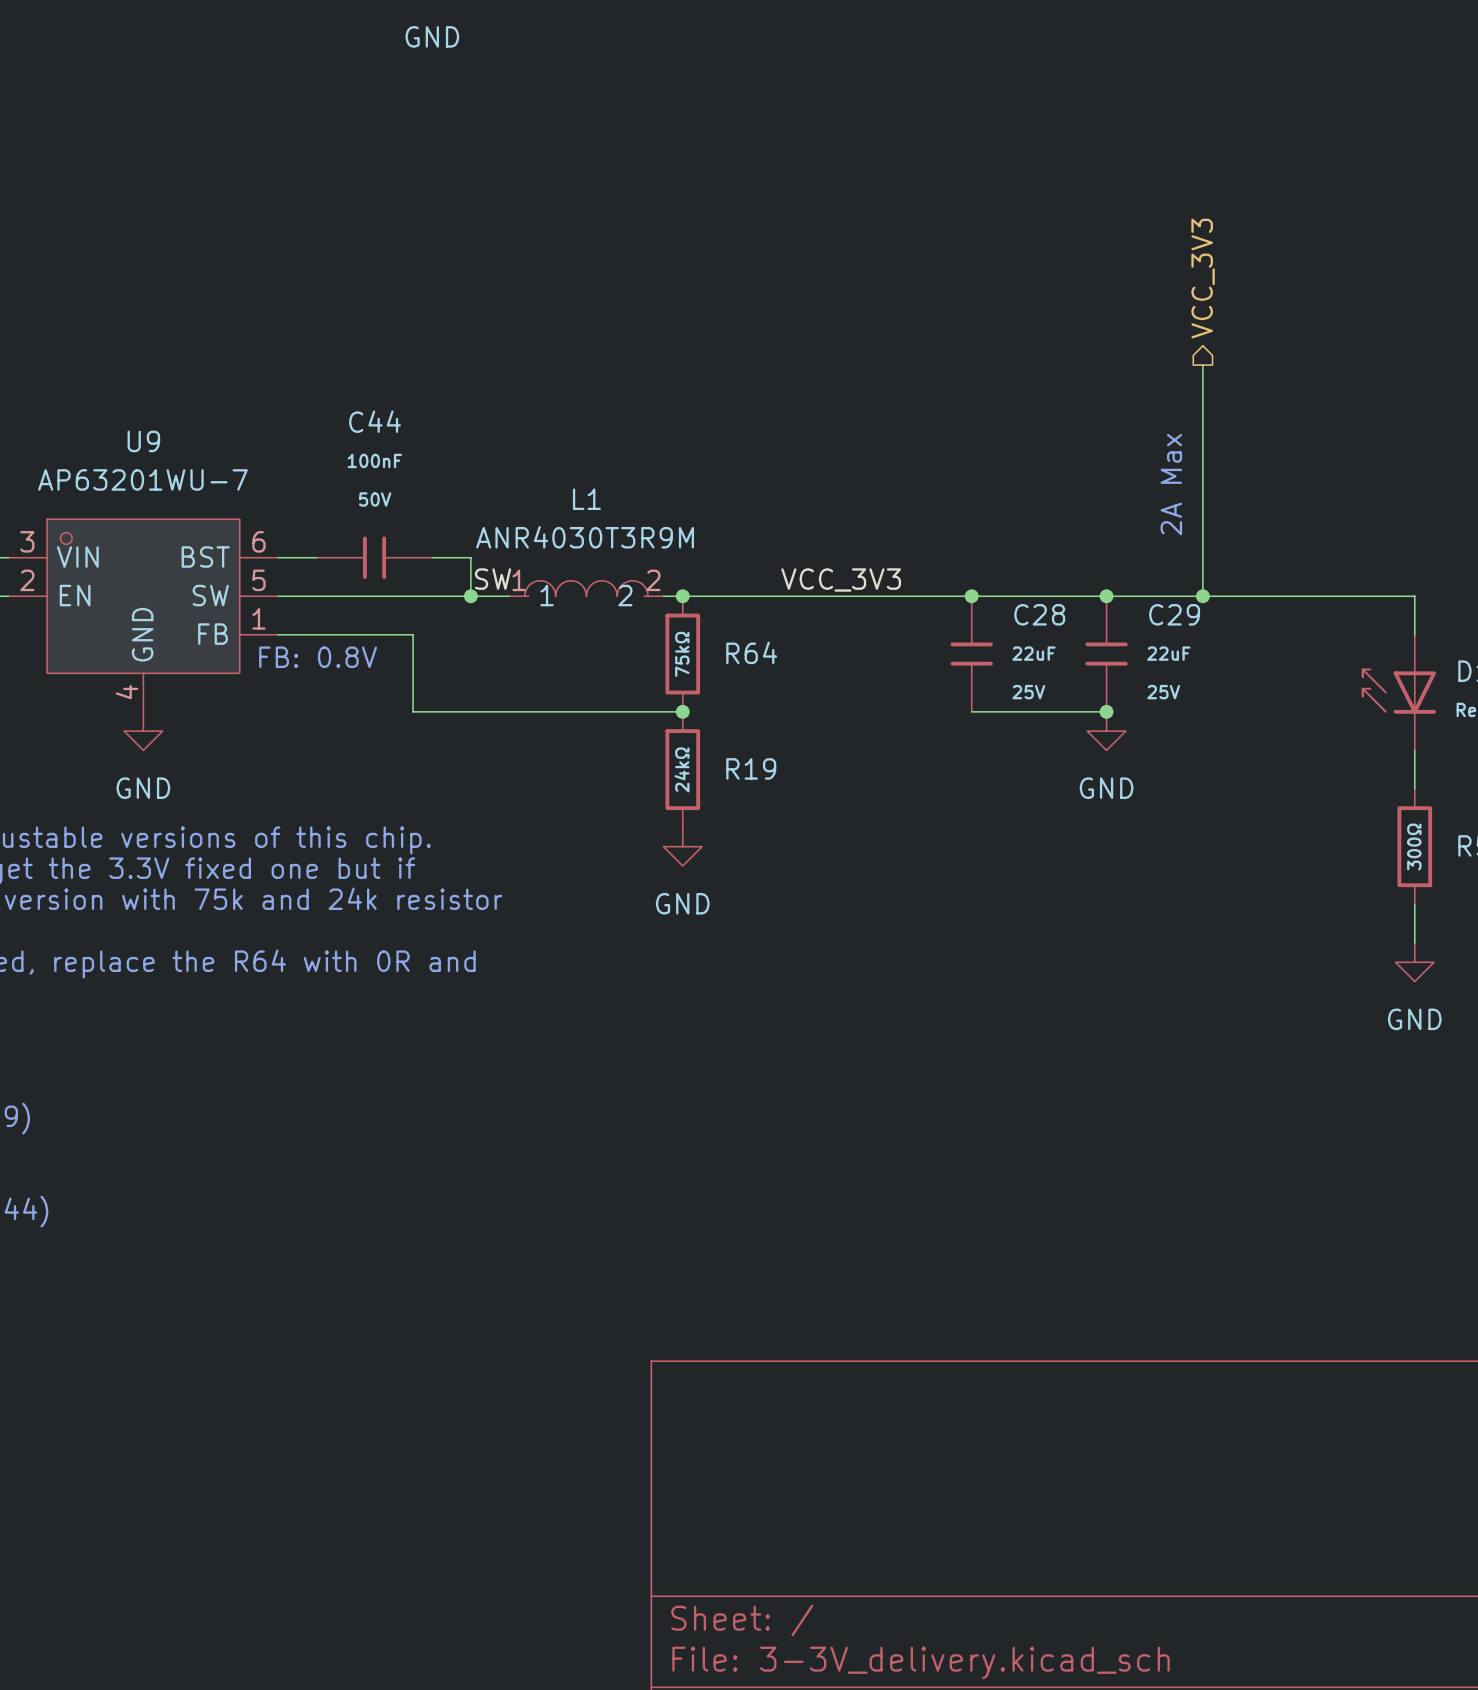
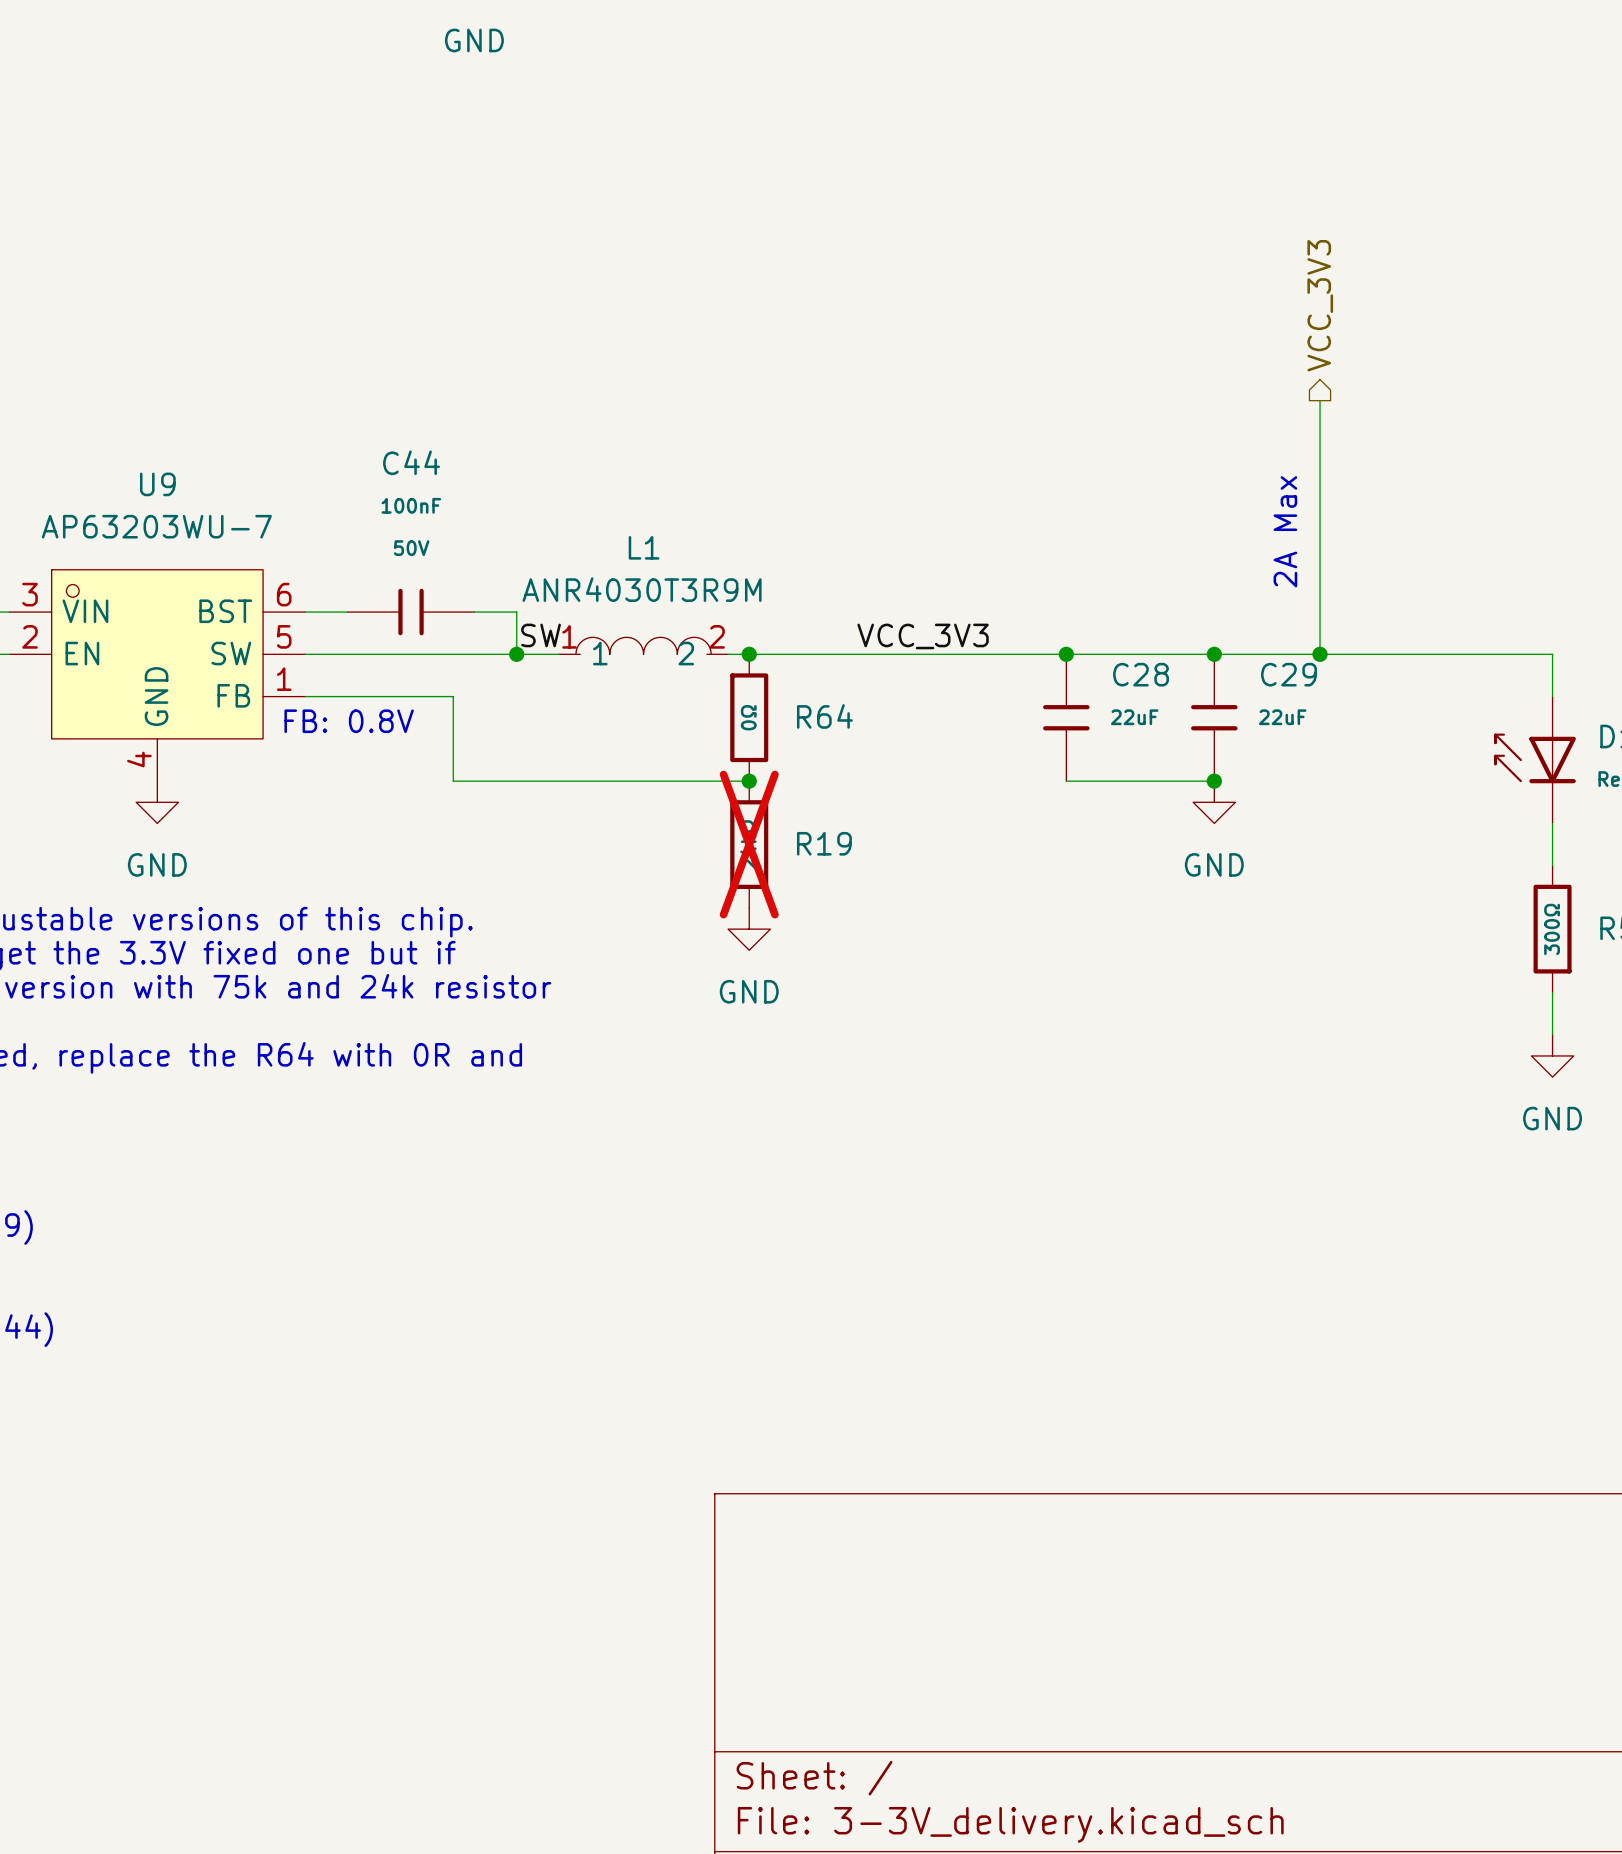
U9 value: AP63201WU-7 (142, 479) -> AP63203WU-7 (156, 526)
R64 value: 75kΩ (682, 654) -> 0Ω (748, 717)
C28 text: 25V (1028, 692) -> none
C29 text: 25V (1163, 692) -> none
R19 do-not-place cross: none -> (749, 844)

